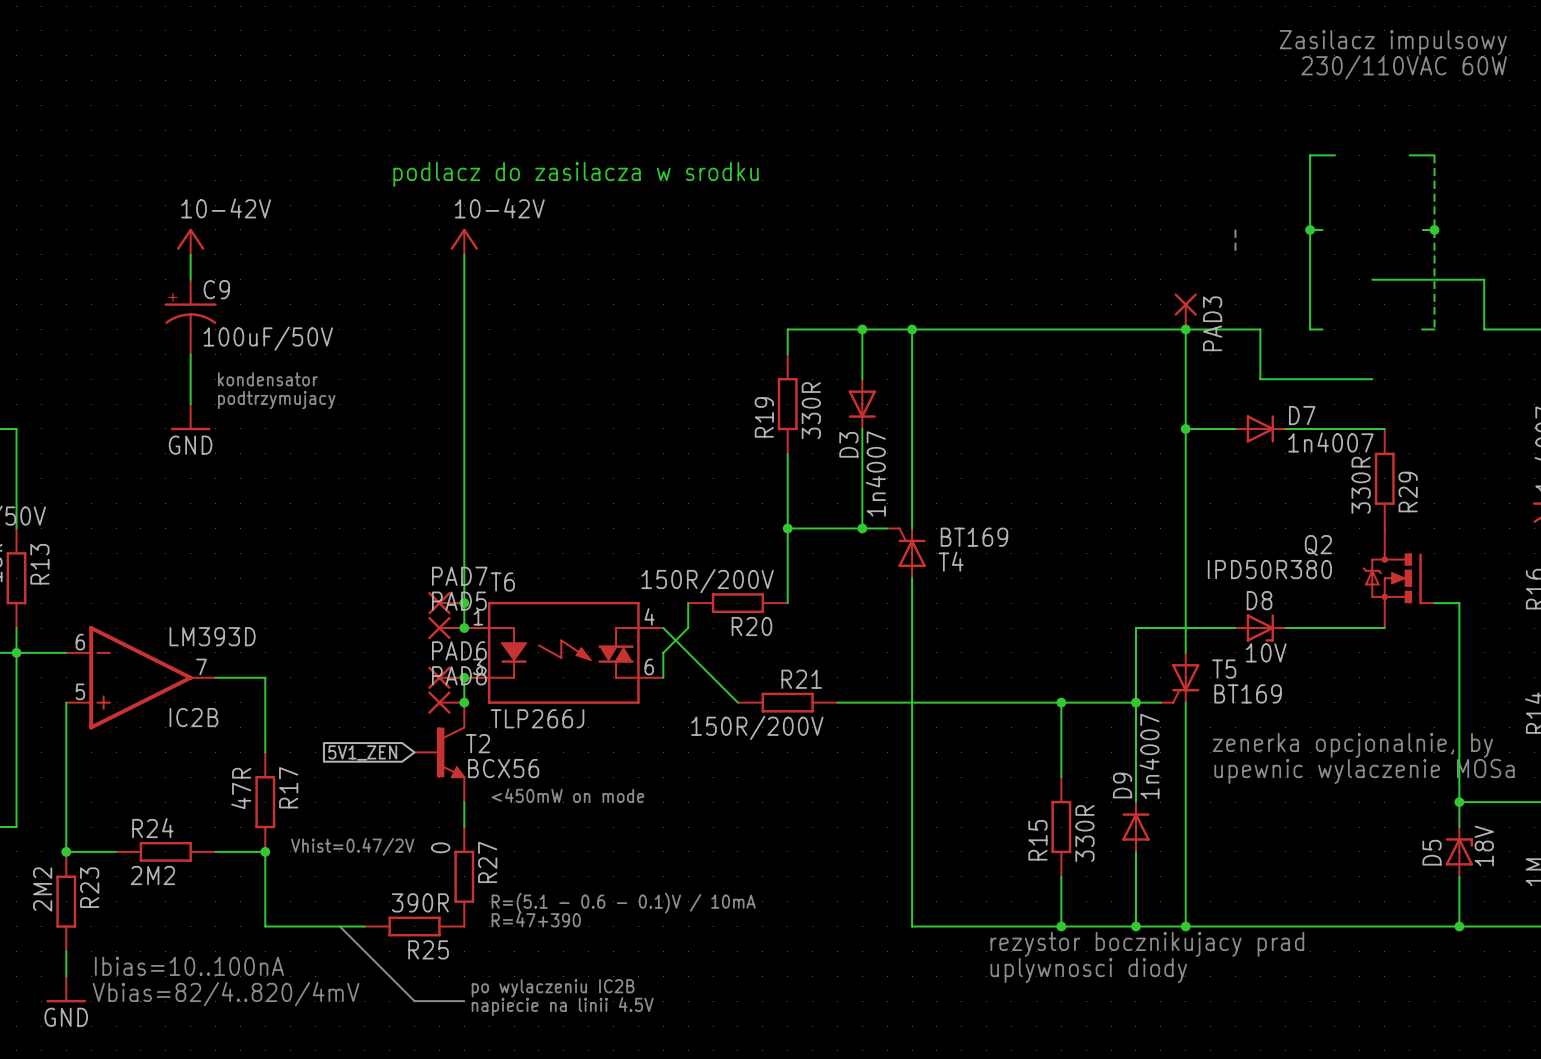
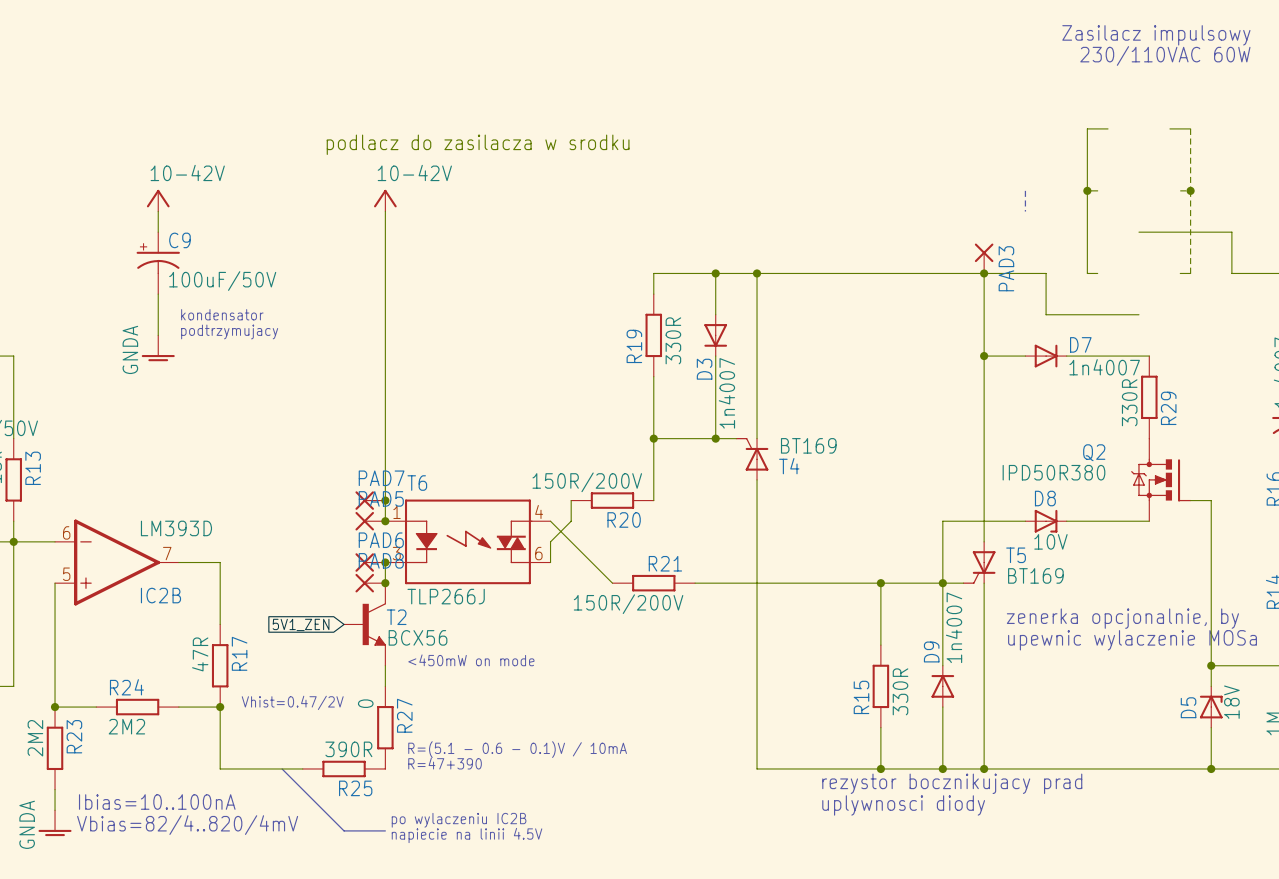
power symbol: GND (190, 417) -> GNDA (158, 348)
power symbol: GND (66, 989) -> GNDA (55, 823)

